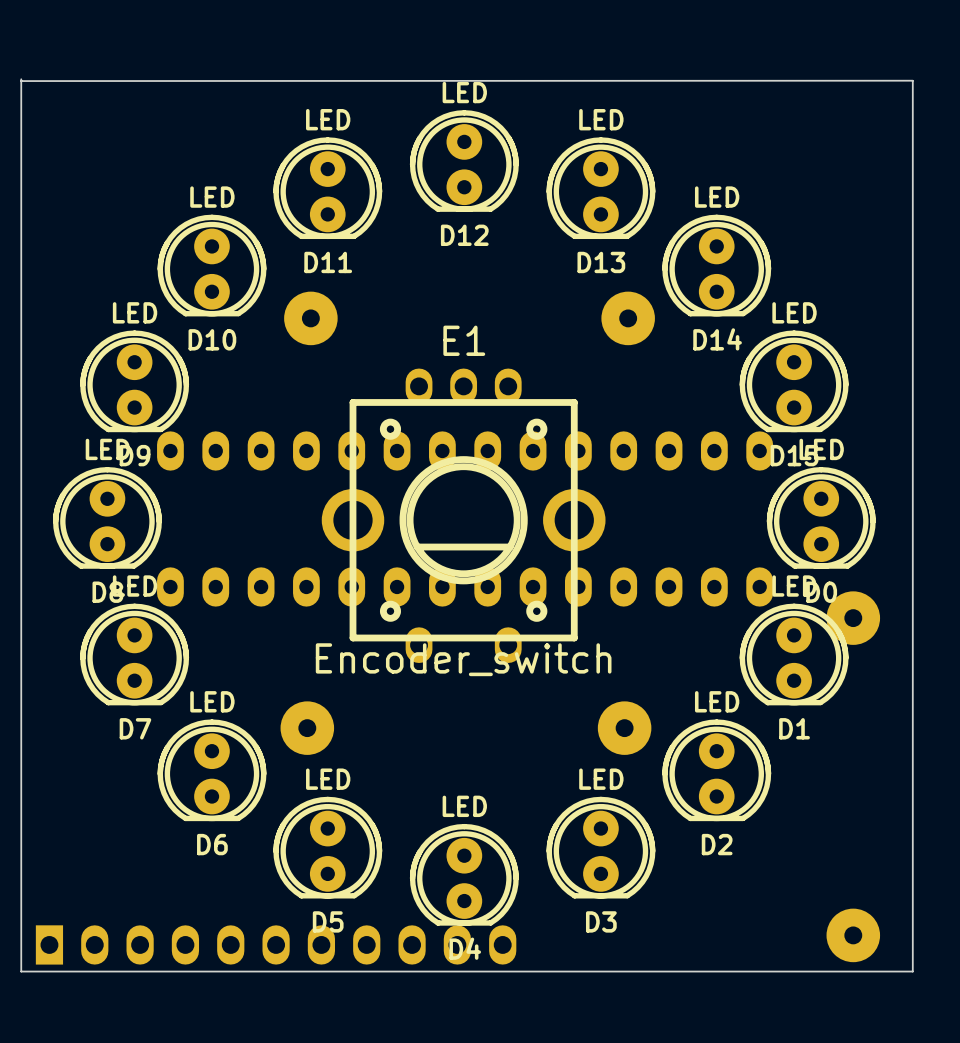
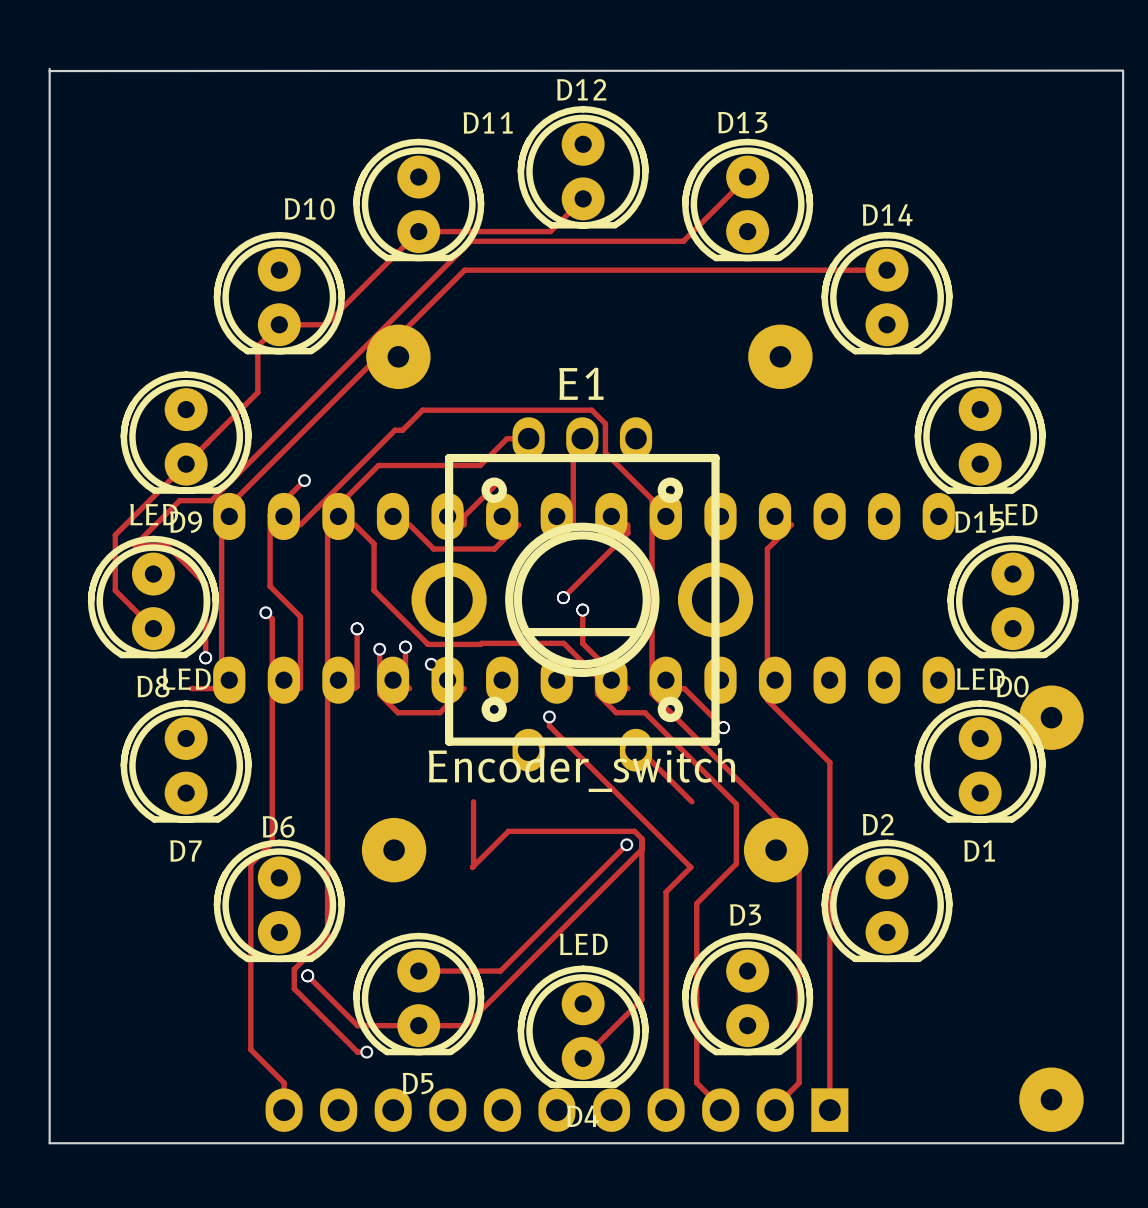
D12 value: LED (464, 92) -> none
D11 value: LED (328, 119) -> none
D13 value: LED (601, 119) -> none
track: none -> (747, 177) (683, 241) (470, 241) (211, 500) (179, 500) (134, 545) (167, 545) (205, 584) (205, 657)
track: none -> (583, 198) (550, 231) (418, 231) (325, 324) (279, 324) (257, 346) (257, 392) (115, 535) (115, 590) (153, 628)
D10 value: LED (212, 197) -> none
D14 value: LED (717, 197) -> none
D12 name position: D12 (464, 235) -> D12 (581, 89)
track: none -> (887, 270) (464, 270) (221, 513) (221, 682) (215, 688) (191, 688)
D11 name position: D11 (328, 262) -> D11 (488, 122)
D13 name position: D13 (601, 262) -> D13 (742, 122)
D9 value: LED (135, 312) -> none
D15 value: LED (794, 312) -> none
D10 name position: D10 (212, 339) -> D10 (309, 208)
D14 name position: D14 (717, 339) -> D14 (887, 214)
track: none -> (528, 438) (507, 438) (480, 465) (378, 465) (327, 516) (327, 936) (294, 969) (294, 988) (357, 1052) (366, 1052)
track: none -> (582, 438) (573, 447) (573, 524)
track: none -> (304, 480) (270, 514) (270, 586) (300, 616) (300, 688)
via: none -> (304, 480)
track: none -> (497, 482) (464, 516) (464, 524)
track: none -> (300, 524) (394, 430) (402, 430) (422, 410) (591, 410) (605, 423) (605, 452) (652, 499) (652, 693) (799, 841) (799, 1082) (775, 1106) (775, 1110)
track: none -> (354, 524) (374, 543) (374, 590) (428, 644) (563, 643) (597, 676) (597, 693) (616, 712) (644, 712) (736, 804) (736, 863) (696, 903) (696, 1082) (720, 1106) (720, 1110)
track: none -> (409, 524) (433, 549) (494, 549) (518, 524)
track: none -> (627, 524) (627, 533) (563, 597)
track: none -> (791, 524) (767, 549) (767, 700) (829, 762) (829, 1110)
via: none -> (563, 597)
track: none -> (582, 610) (582, 643) (627, 688)
via: none -> (582, 610)
track: none -> (265, 612) (272, 619) (272, 842) (250, 864) (250, 1049) (284, 1082) (284, 1110)
via: none -> (265, 612)
track: none -> (357, 628) (357, 686) (354, 688)
via: none -> (357, 628)
track: none -> (405, 647) (405, 684) (409, 688)
via: none -> (405, 647)
track: none -> (379, 649) (379, 694) (397, 712) (439, 712) (464, 688)
via: none -> (379, 649)
via: none -> (205, 657)
via: none -> (431, 664)
track: none -> (682, 688) (723, 727)
track: none -> (549, 716) (549, 725) (690, 867) (666, 892) (666, 1110)
via: none -> (549, 716)
via: none -> (723, 727)
track: none -> (636, 750) (640, 750) (691, 801)
track: none -> (473, 801) (473, 866)
D6 value: LED (212, 701) -> none
D2 value: LED (717, 701) -> none
track: none -> (626, 844) (500, 971) (418, 971)
via: none -> (626, 844)
track: none -> (641, 849) (465, 1025) (357, 1025) (307, 975)
track: none -> (472, 867) (508, 831) (634, 831) (641, 838) (641, 999) (583, 1058)
D5 value: LED (328, 779) -> none
D3 value: LED (601, 779) -> none
via: none -> (307, 975)
D6 name position: D6 (212, 844) -> D6 (278, 826)
D2 name position: D2 (717, 844) -> D2 (878, 824)
via: none -> (366, 1052)
D3 name position: D3 (601, 921) -> D3 (745, 914)
part: (276, 944) -> none
part: none -> (556, 1110)

